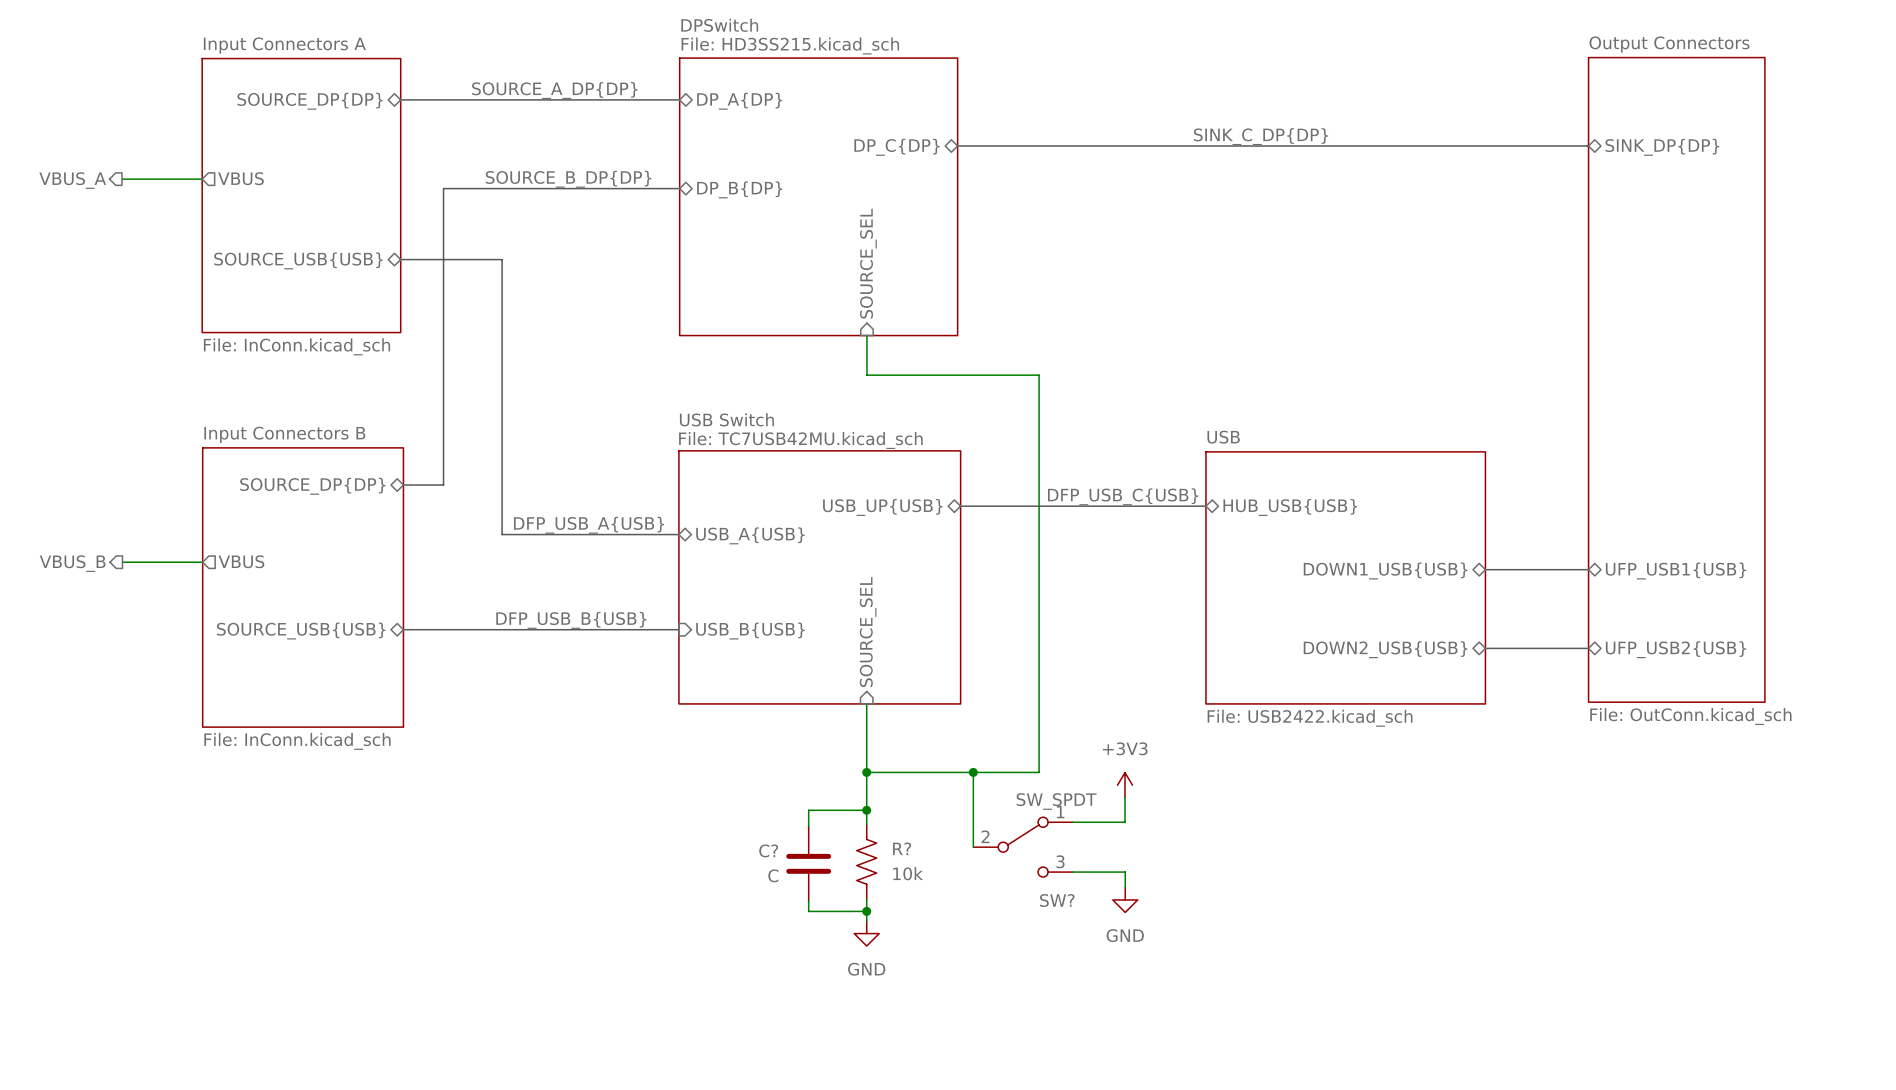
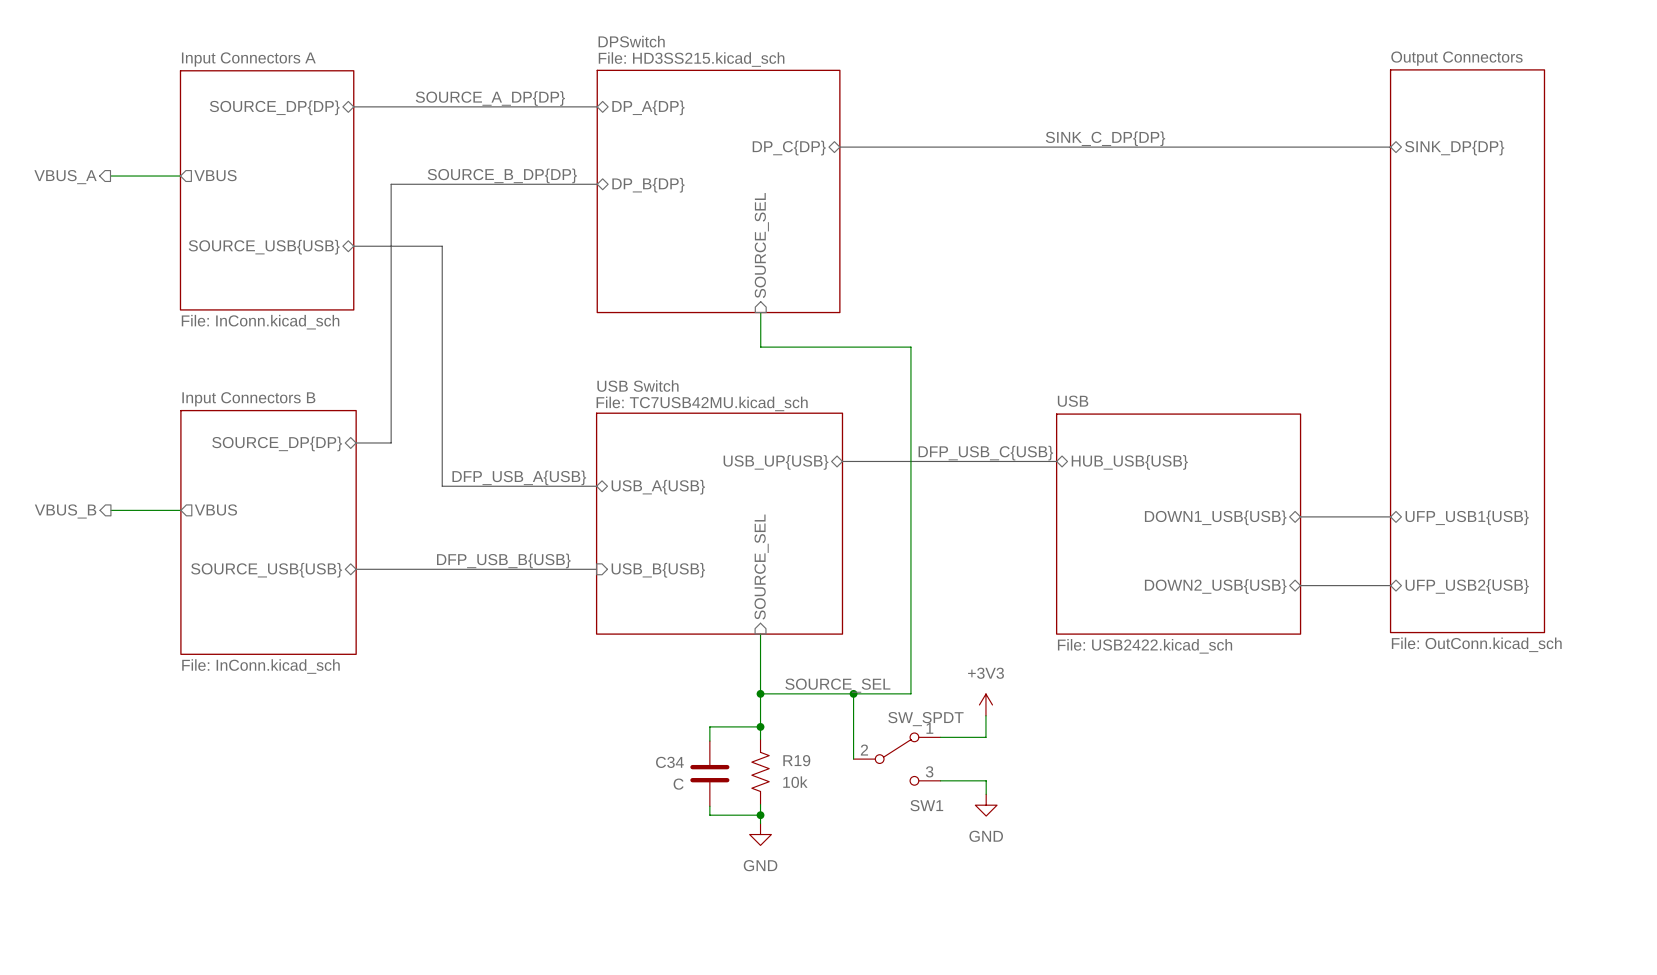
label: none -> SOURCE_SEL (837, 685)
R? name: R? (902, 848) -> R19 (796, 760)
C? name: C? (768, 850) -> C34 (669, 762)
SW? name: SW? (1057, 900) -> SW1 (926, 805)

